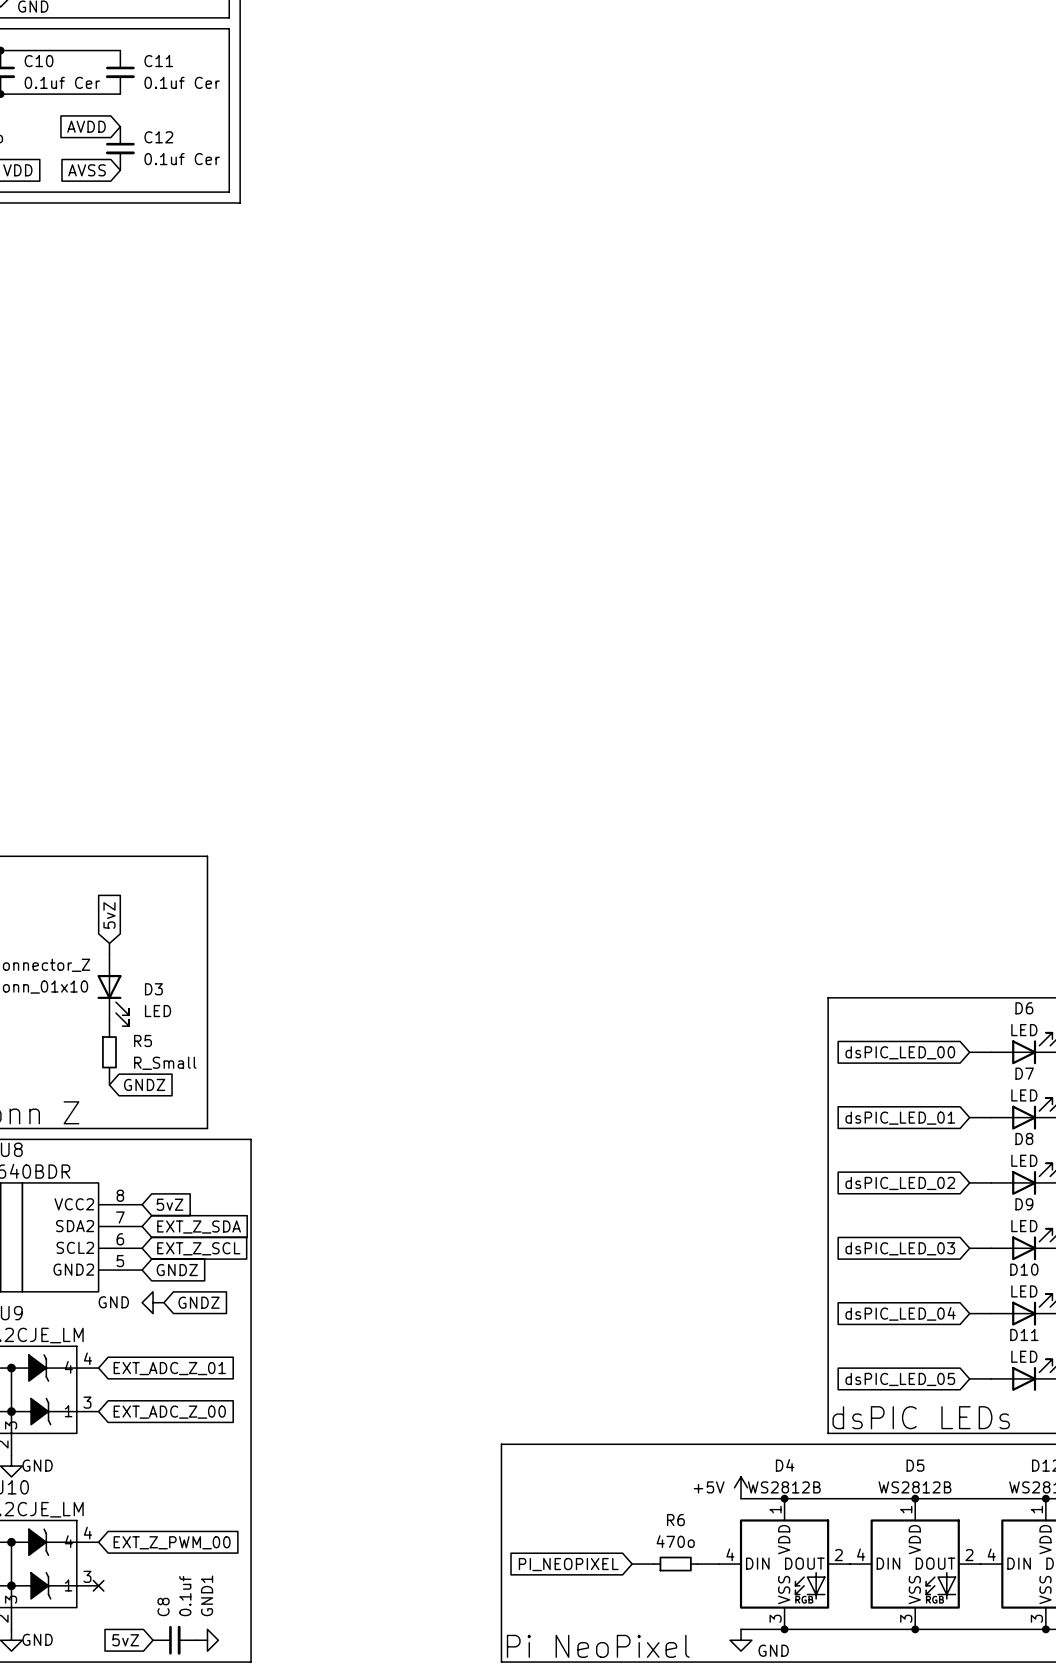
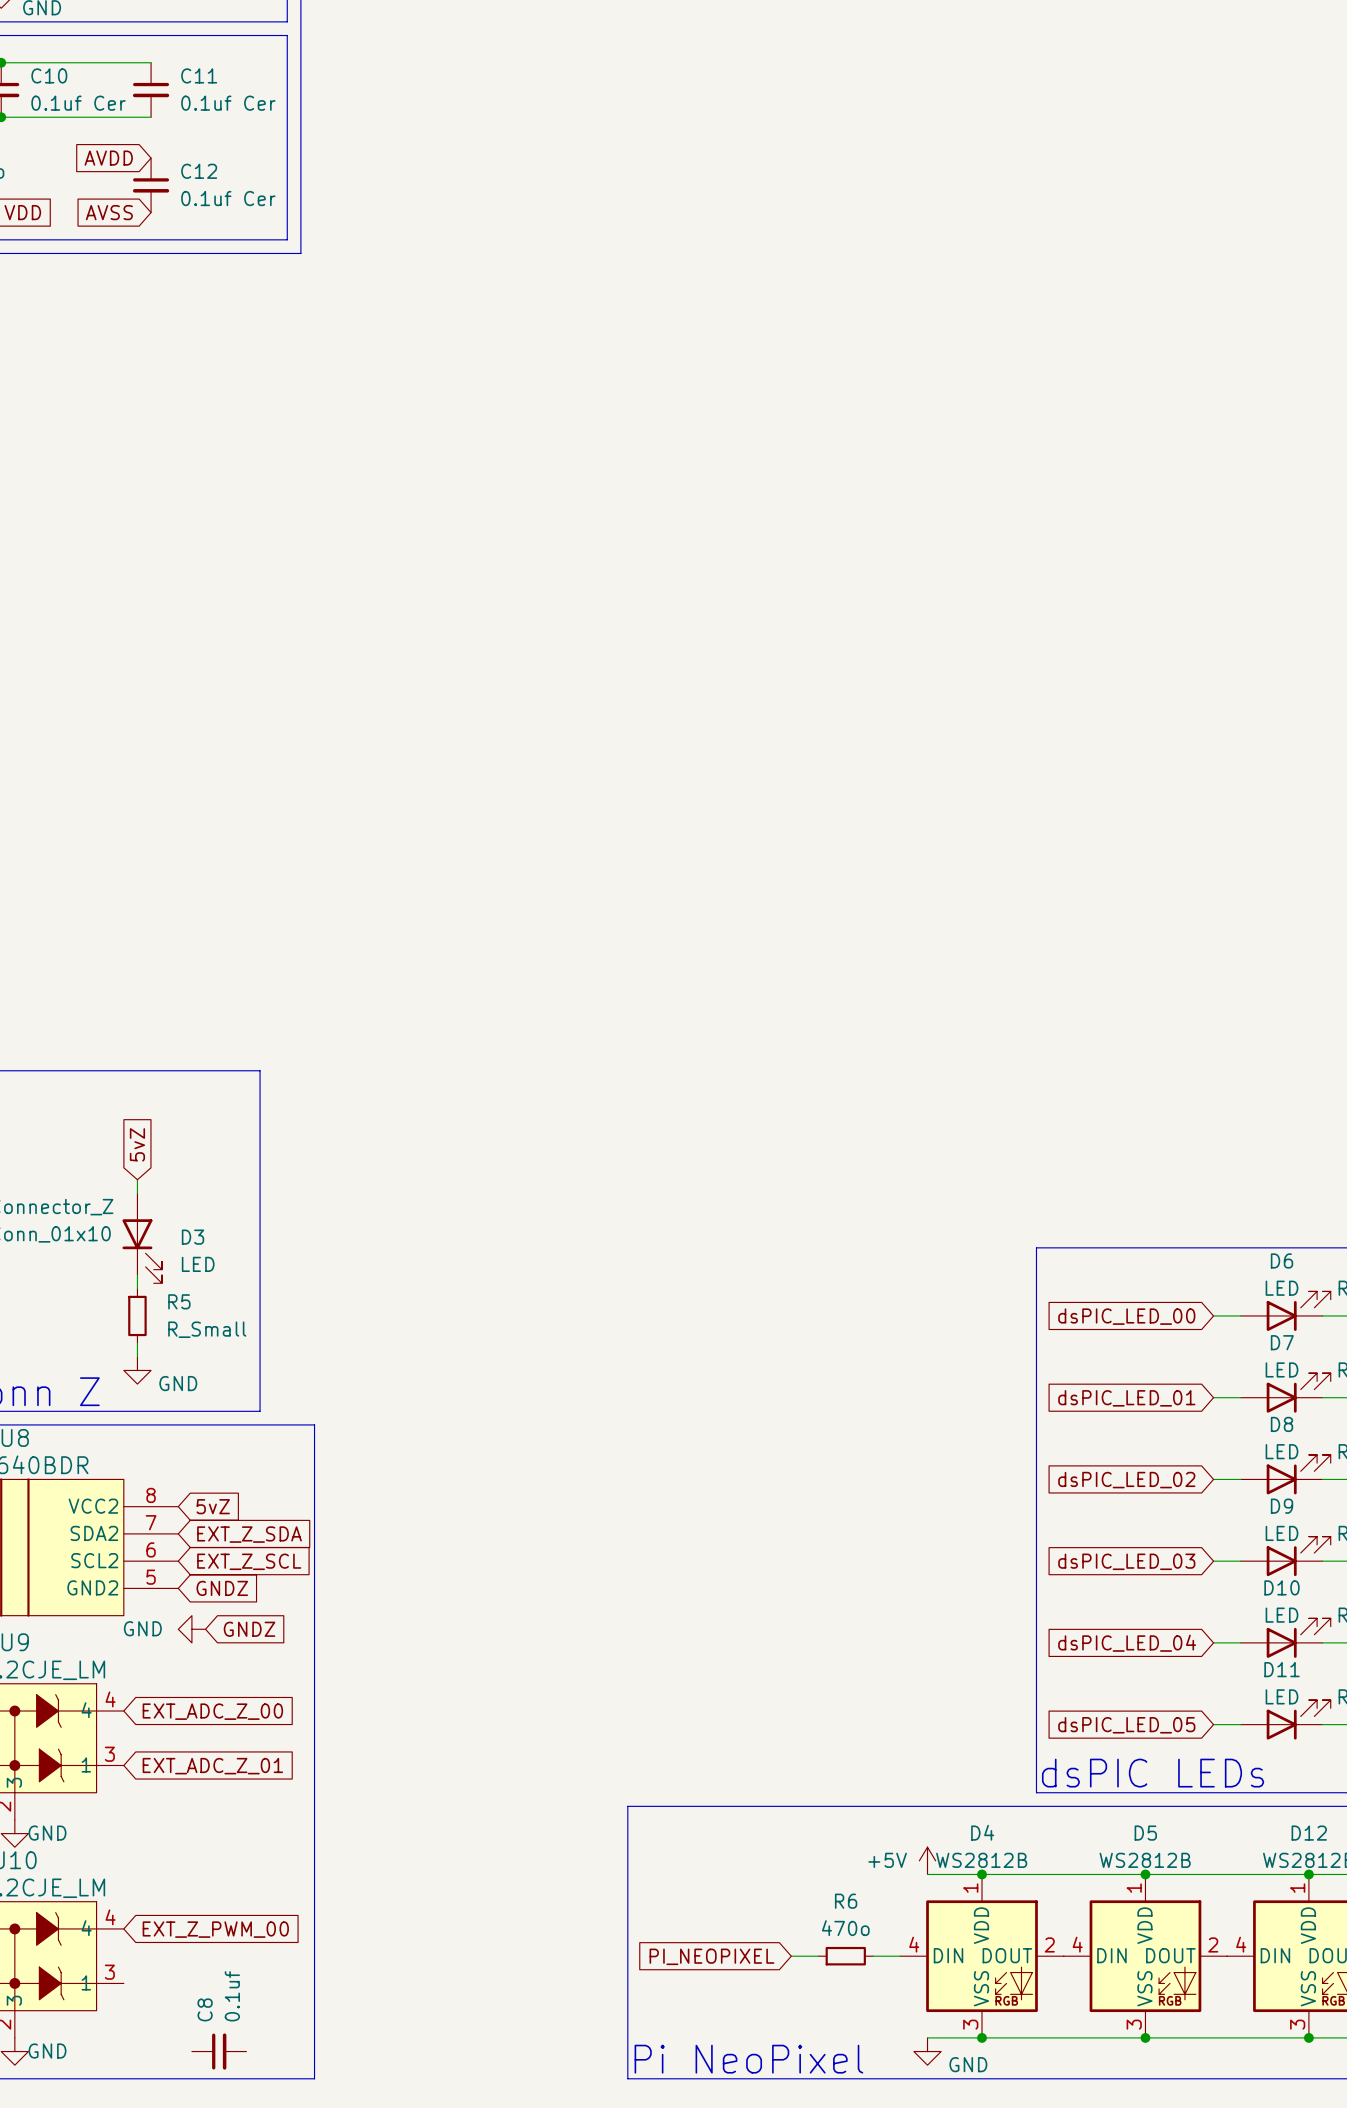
global label: GNDZ (144, 1084) -> none
power symbol: none -> GND (137, 1370)
global label: EXT_ADC_Z_01 (169, 1368) -> EXT_ADC_Z_00 (212, 1711)
global label: EXT_ADC_Z_00 (169, 1412) -> EXT_ADC_Z_01 (212, 1766)
no-connect mark: (98, 1585) -> none
global label: 5vZ (125, 1640) -> none
power symbol: GND1 (207, 1640) -> none

